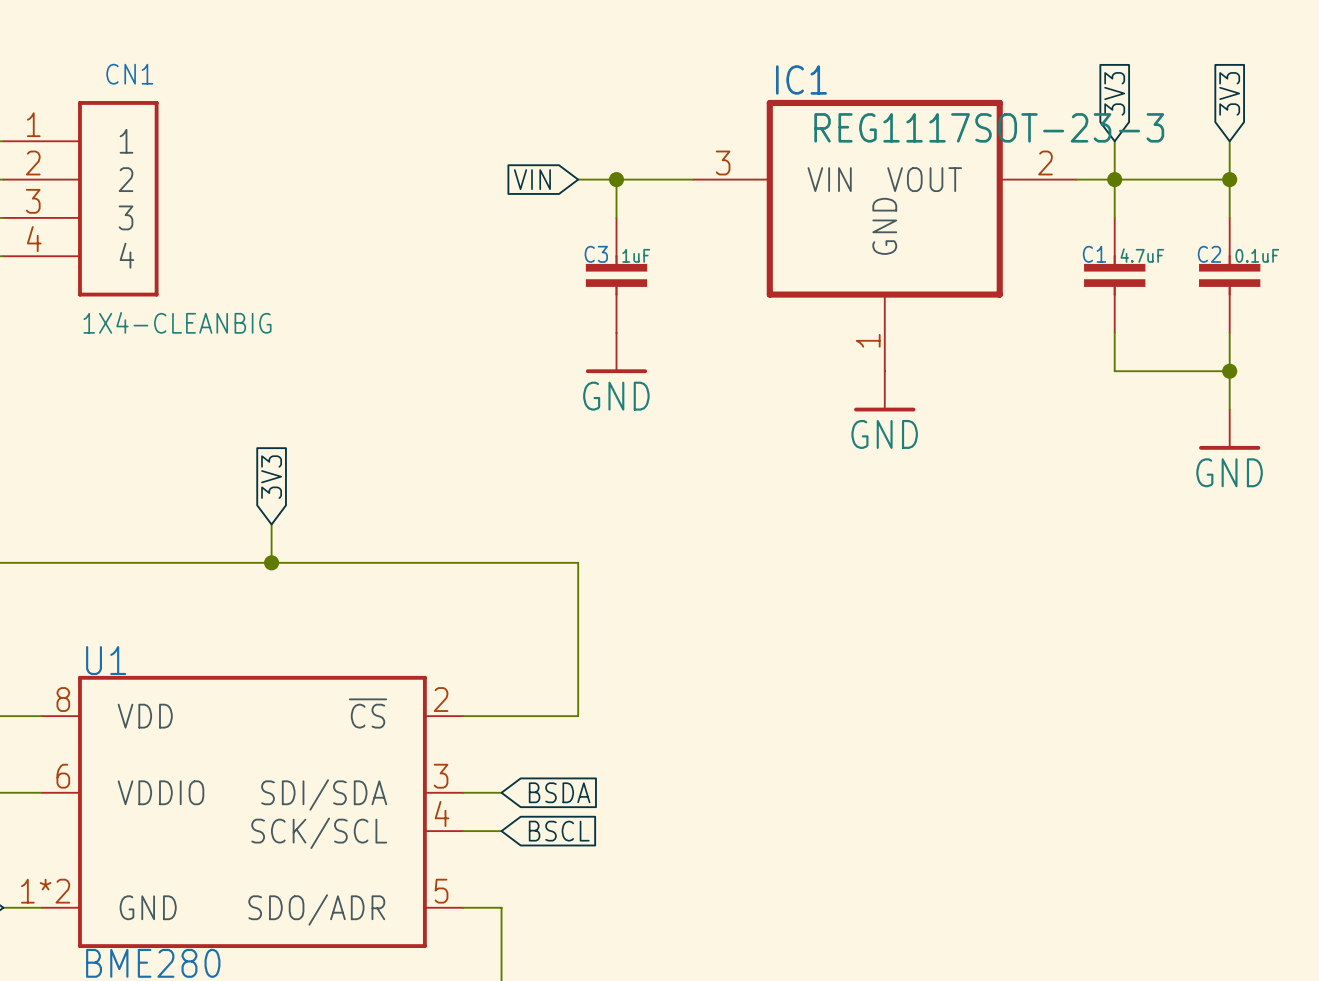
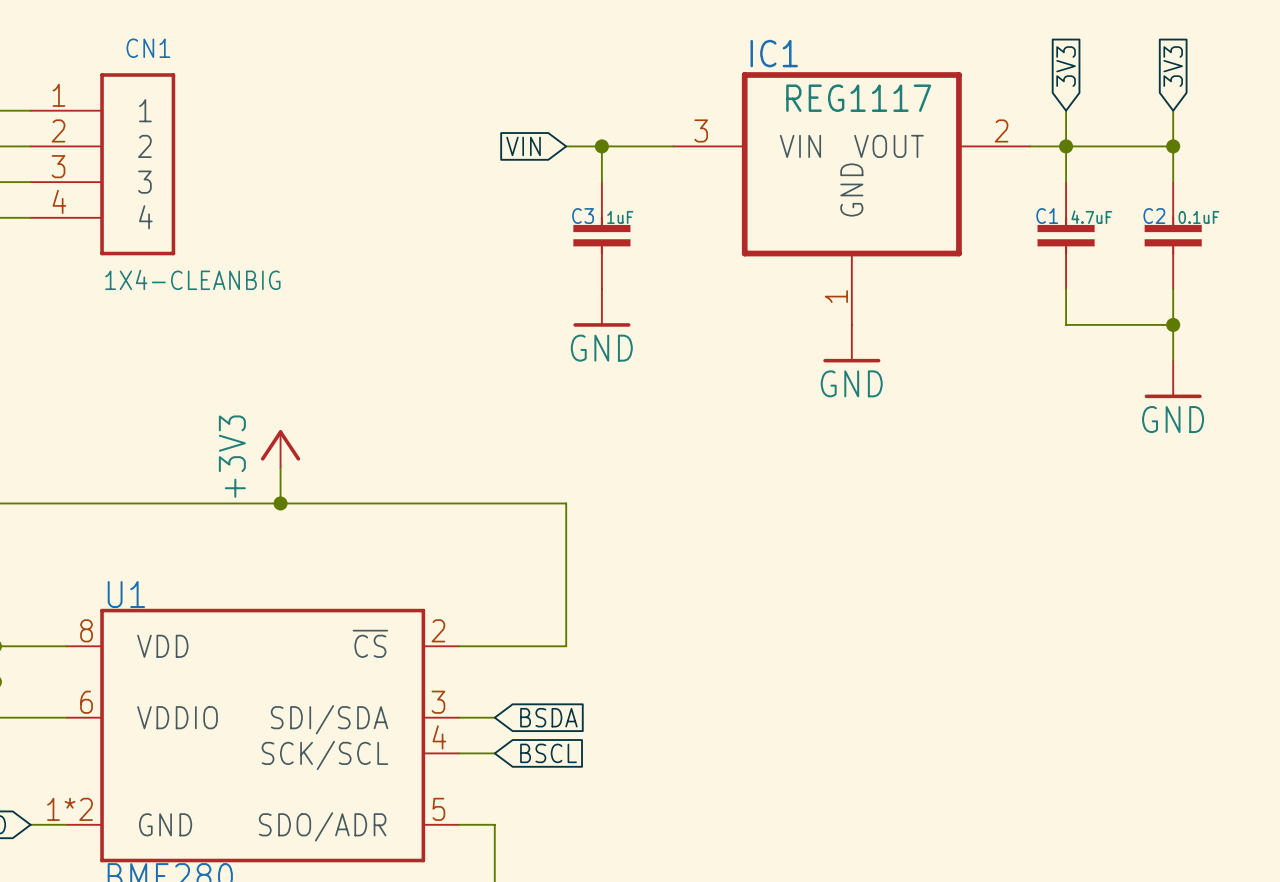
IC1 value: REG1117SOT-23-3 (989, 127) -> REG1117 (858, 98)
global label: 3V3 (271, 477) -> none
power symbol: none -> +3V3 (280, 449)

